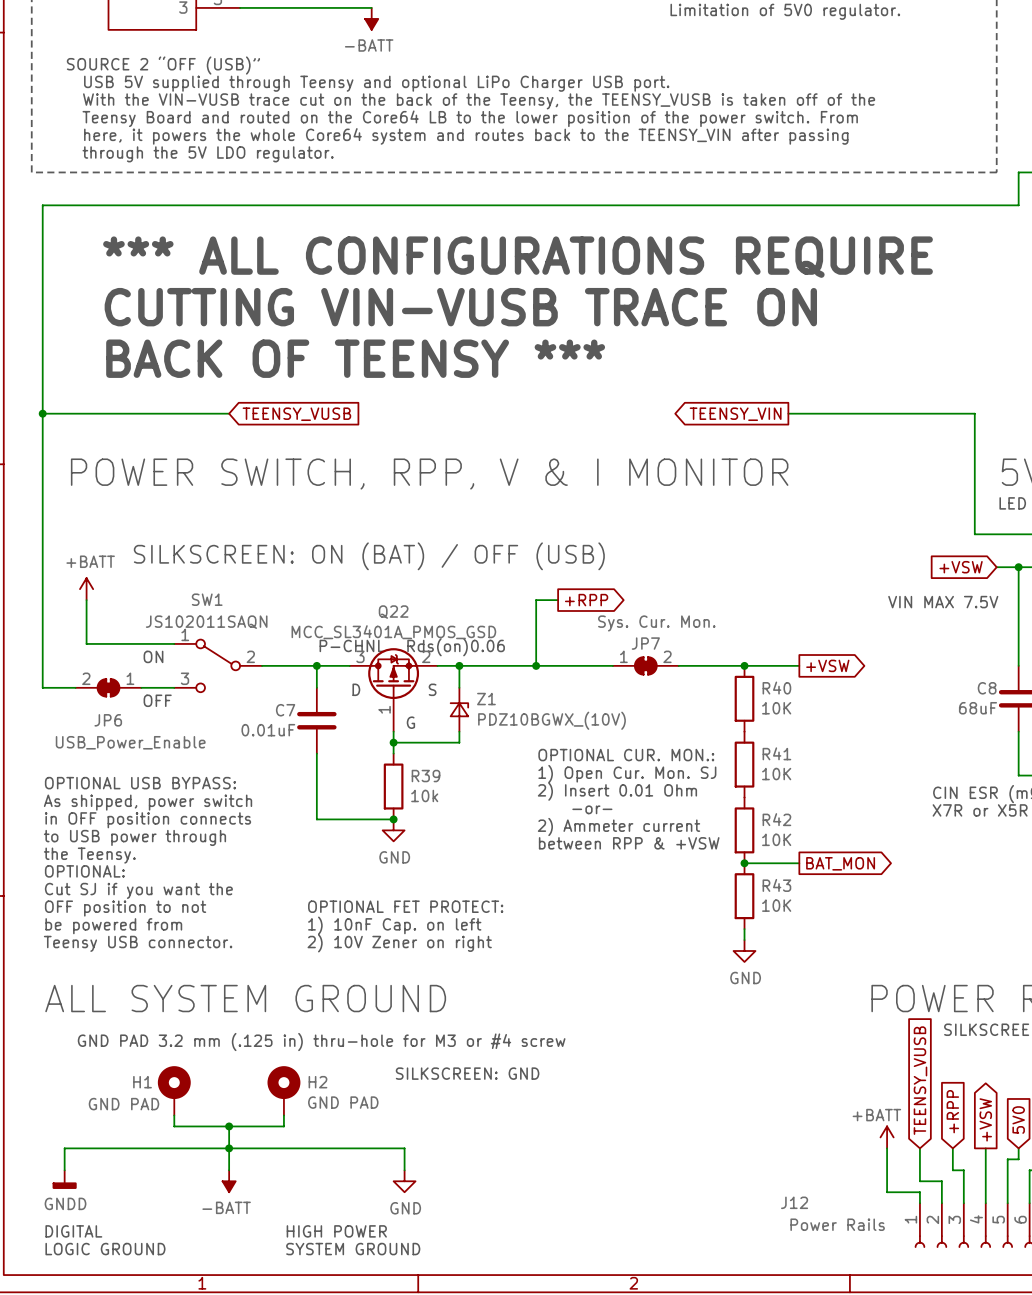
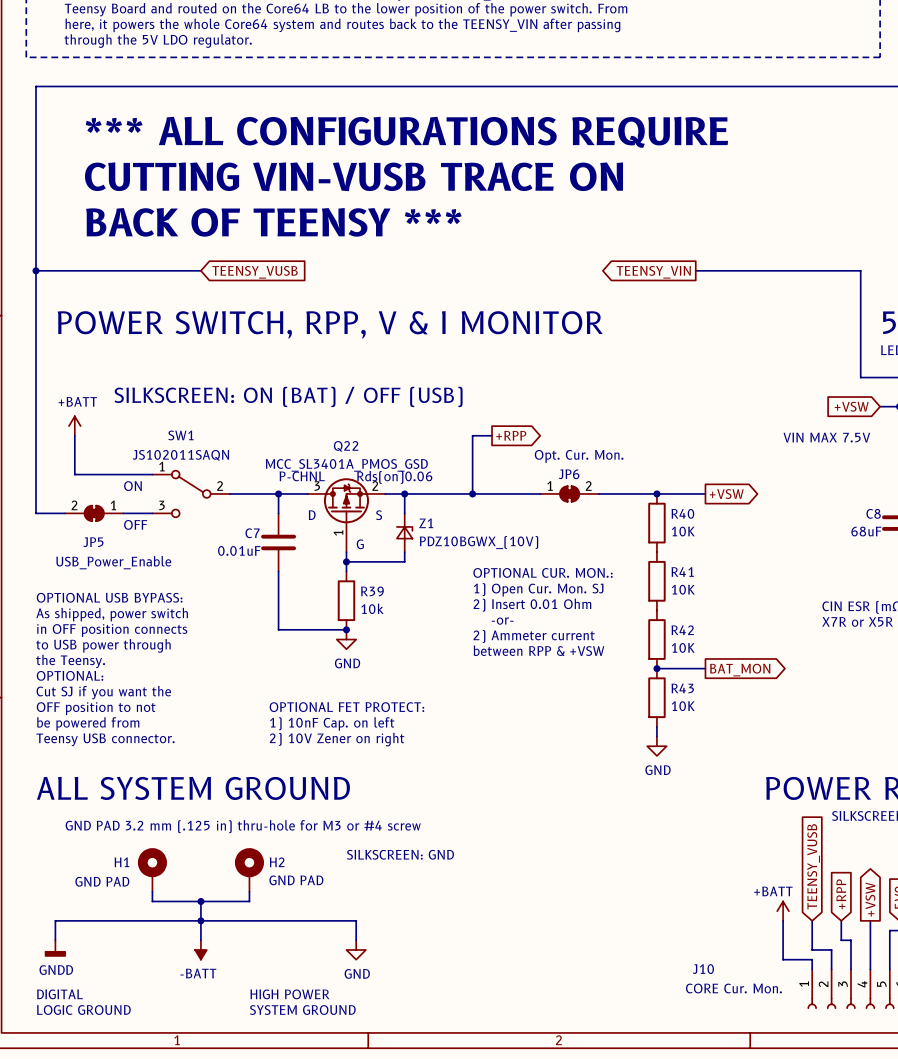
JP7 value: Sys. Cur. Mon. (656, 623) -> Opt. Cur. Mon. (579, 456)
JP7 name: JP7 (645, 643) -> JP6 (569, 474)
JP6 name: JP6 (108, 720) -> JP5 (93, 542)
J12 name: J12 (794, 1202) -> J10 (703, 969)
J12 value: Power Rails (837, 1224) -> CORE Cur. Mon. (733, 988)

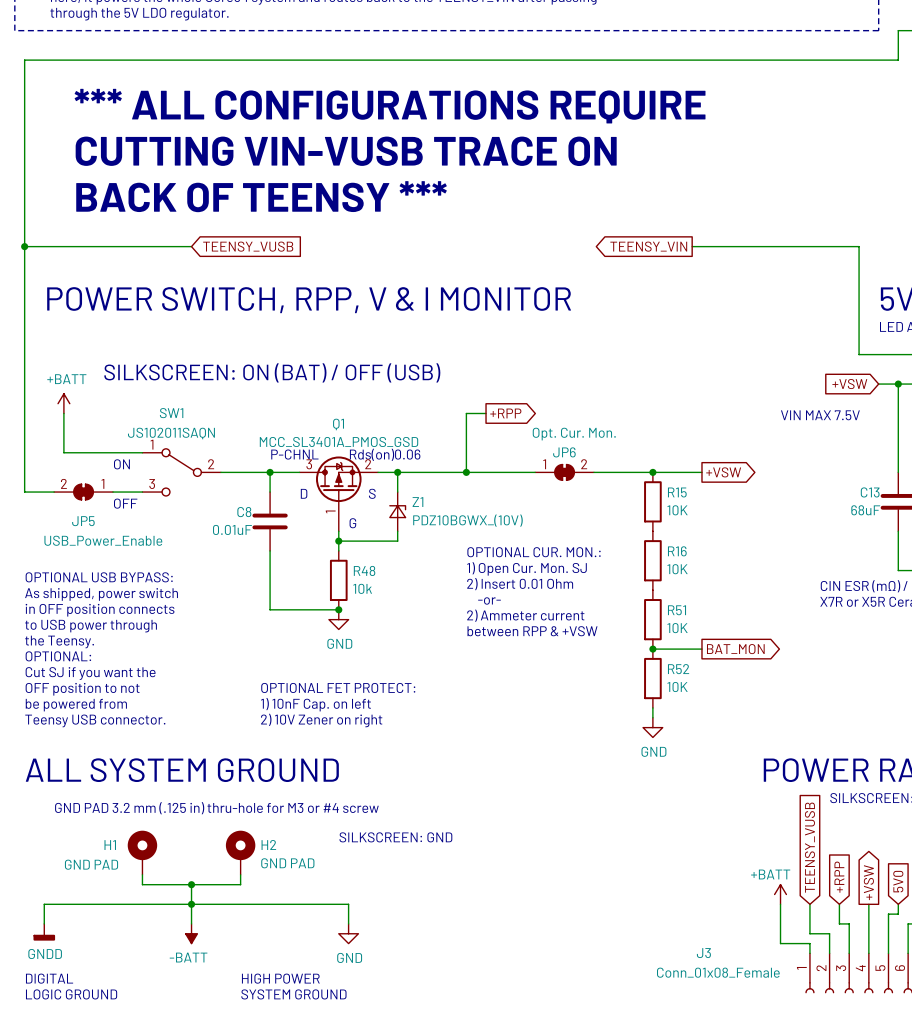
Q22 name: Q22 (346, 446) -> Q1 (338, 424)
R40 name: R40 (682, 513) -> R15 (677, 492)
C8 name: C8 (873, 513) -> C13 (870, 492)
C7 name: C7 (252, 533) -> C8 (244, 512)
R41 name: R41 (682, 572) -> R16 (677, 551)
R39 name: R39 (372, 591) -> R48 (364, 570)
R42 name: R42 (682, 630) -> R51 (677, 610)
R43 name: R43 (682, 688) -> R52 (678, 669)
J10 name: J10 (703, 969) -> J3 (703, 953)
J10 value: CORE Cur. Mon. (733, 988) -> Conn_01x08_Female (718, 972)

